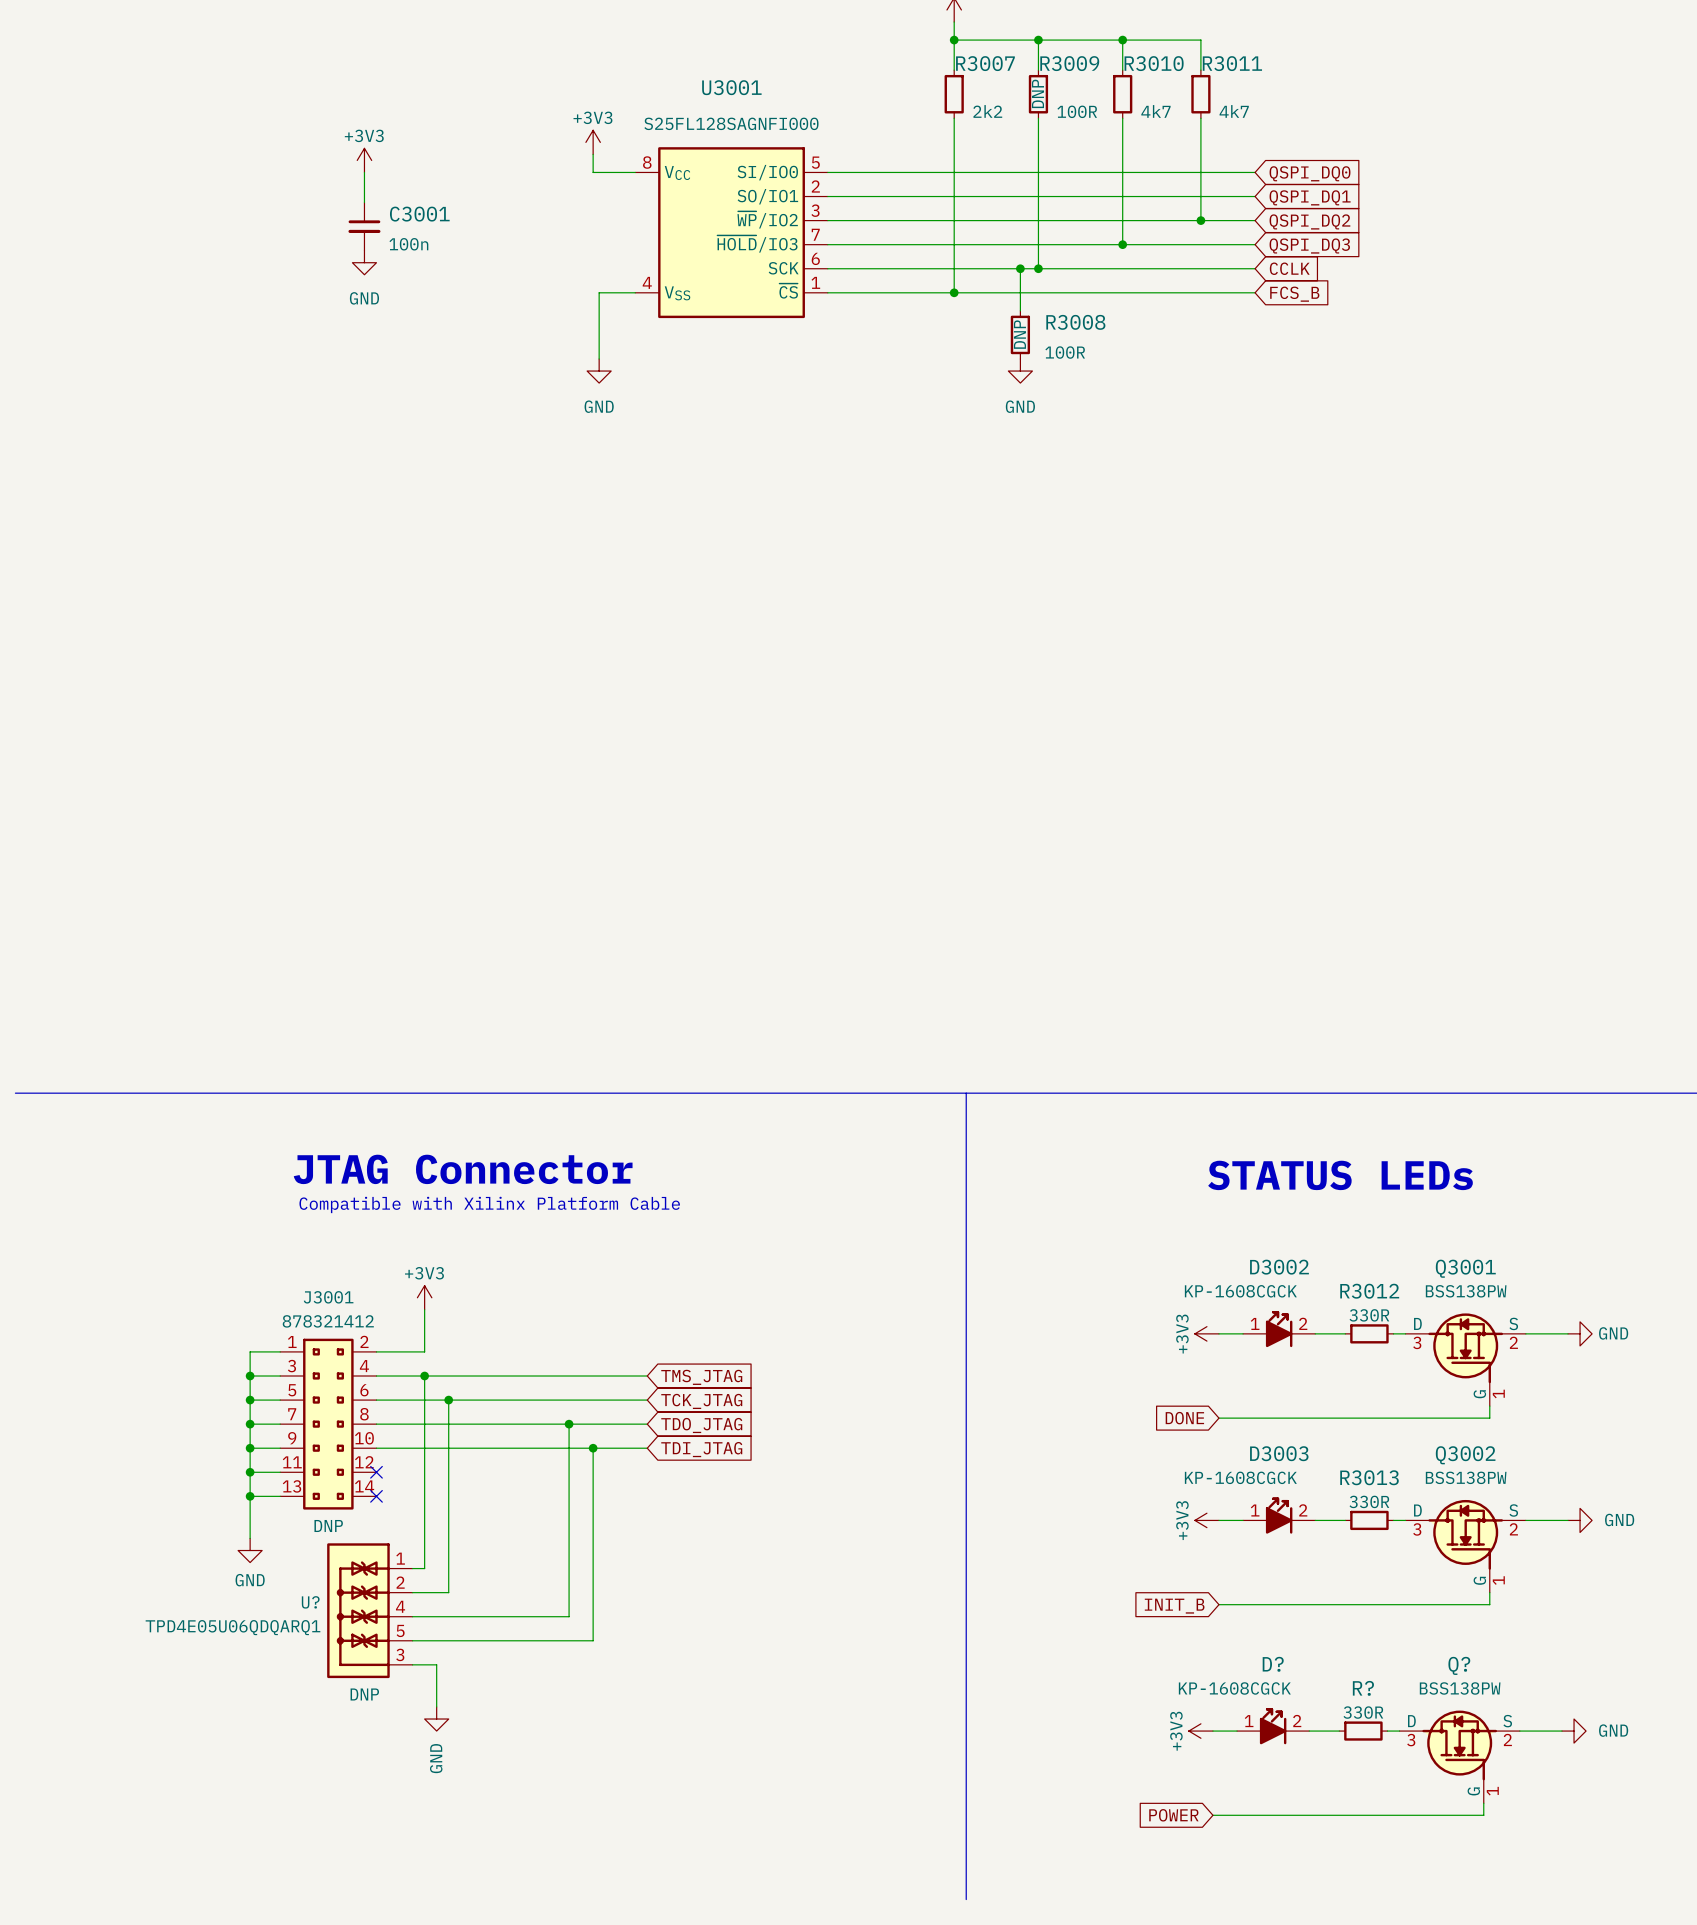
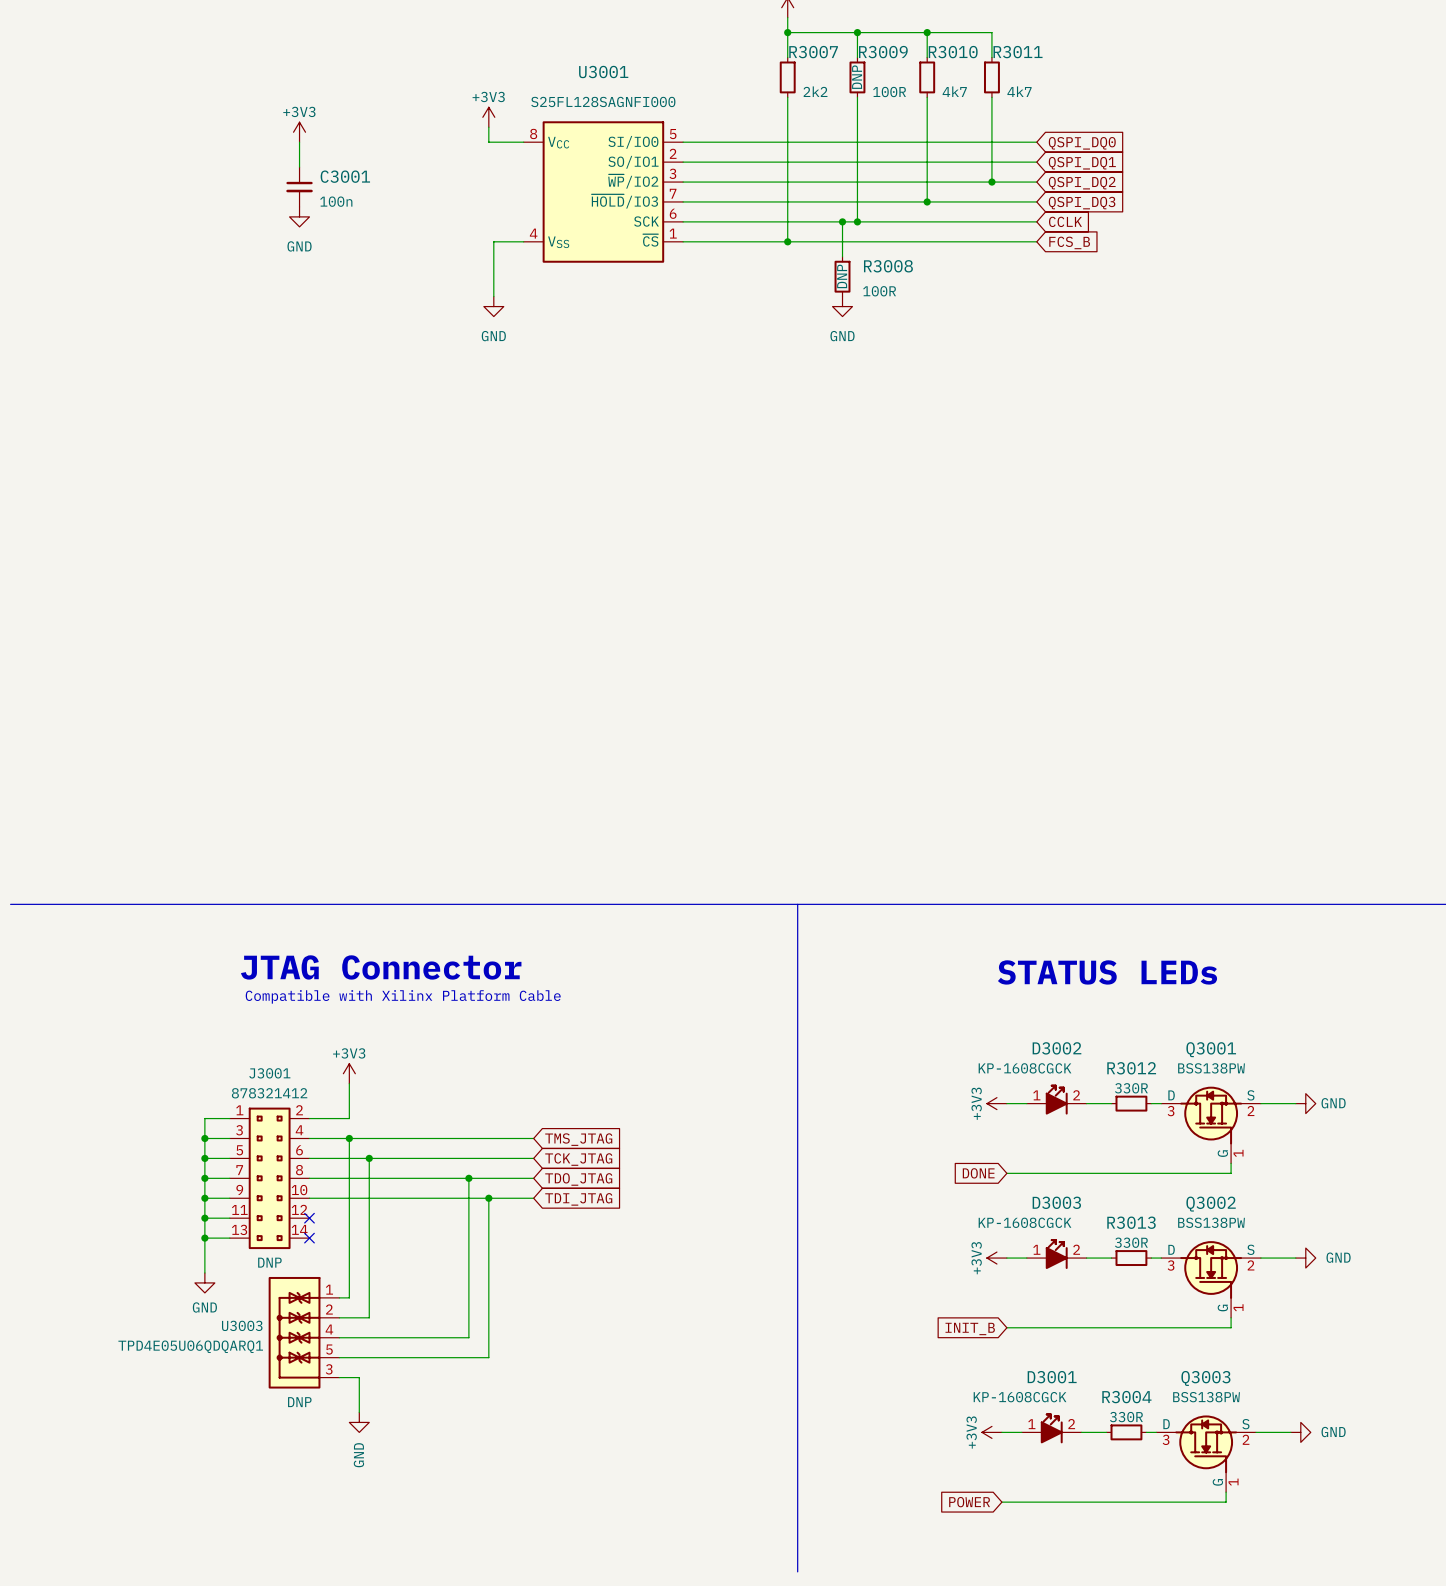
U? name: U? (310, 1602) -> U3003 (242, 1325)
D? name: D? (1273, 1664) -> D3001 (1052, 1377)
Q? name: Q? (1459, 1665) -> Q3003 (1205, 1378)
R? name: R? (1363, 1688) -> R3004 (1126, 1397)

